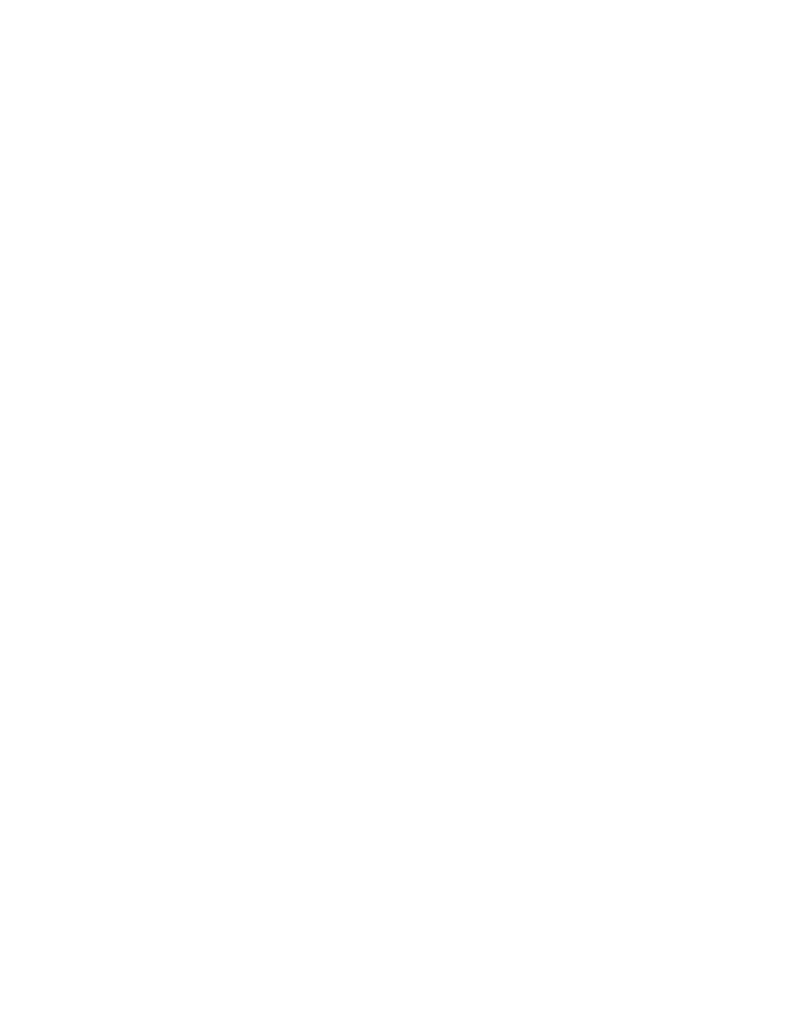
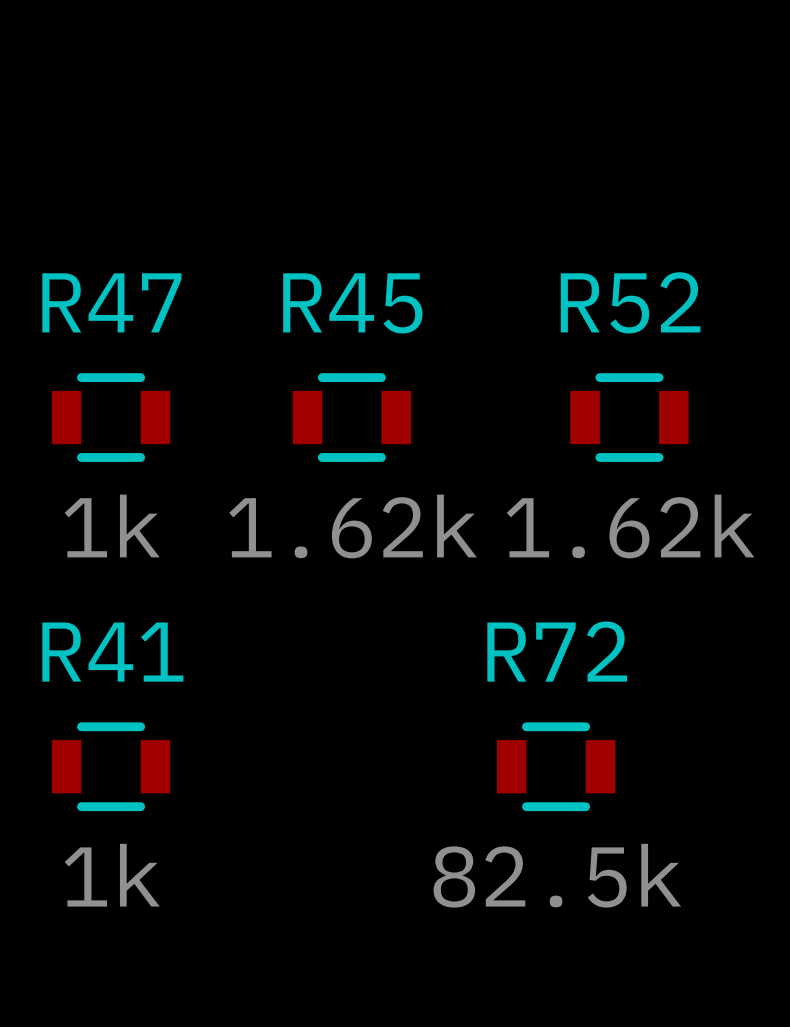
R47: none -> 1k (111, 417)
R45: none -> 1.62k (351, 417)
R52: none -> 1.62k (629, 417)
R41: none -> 1k (111, 766)
R72: none -> 82.5k (556, 766)

